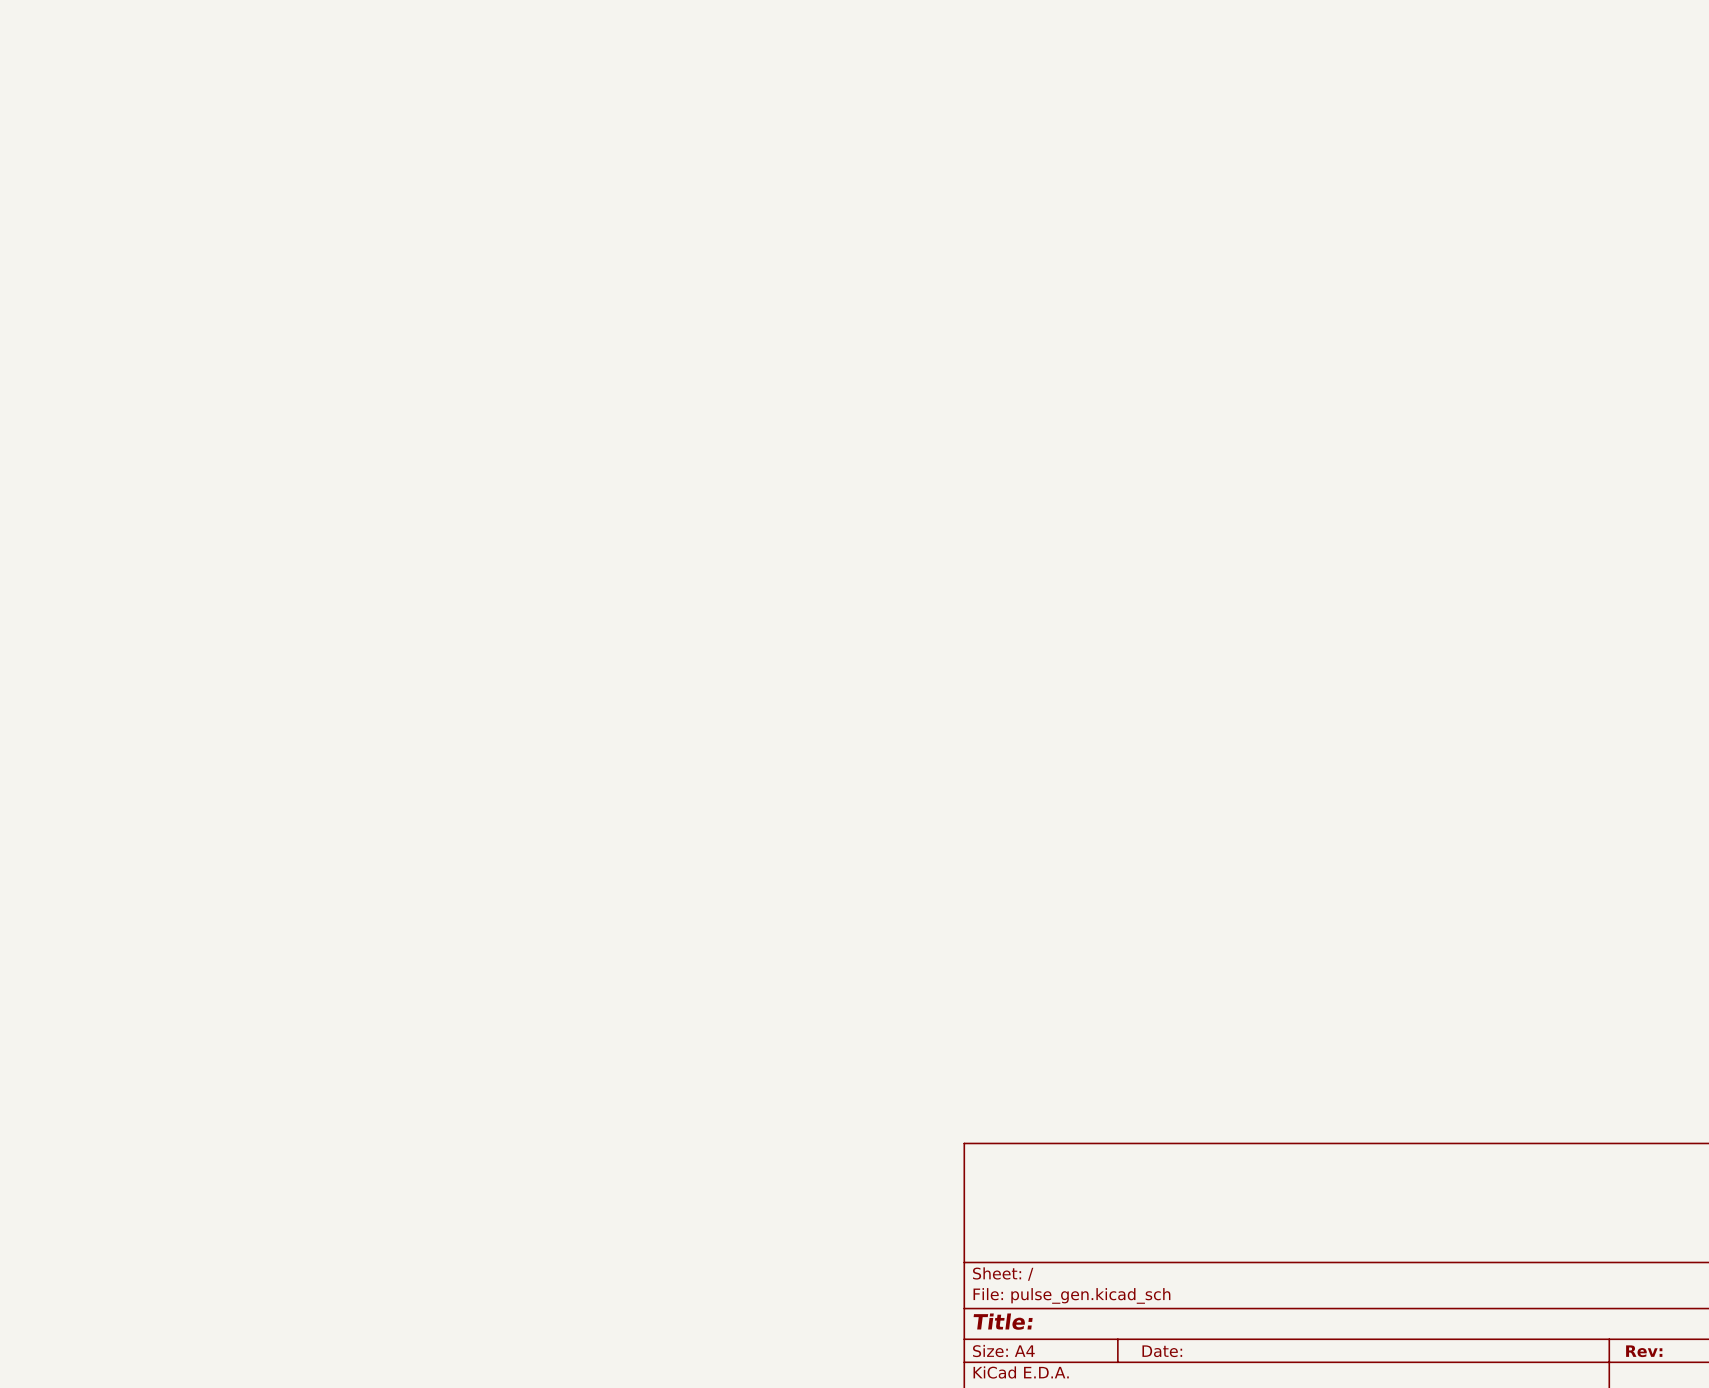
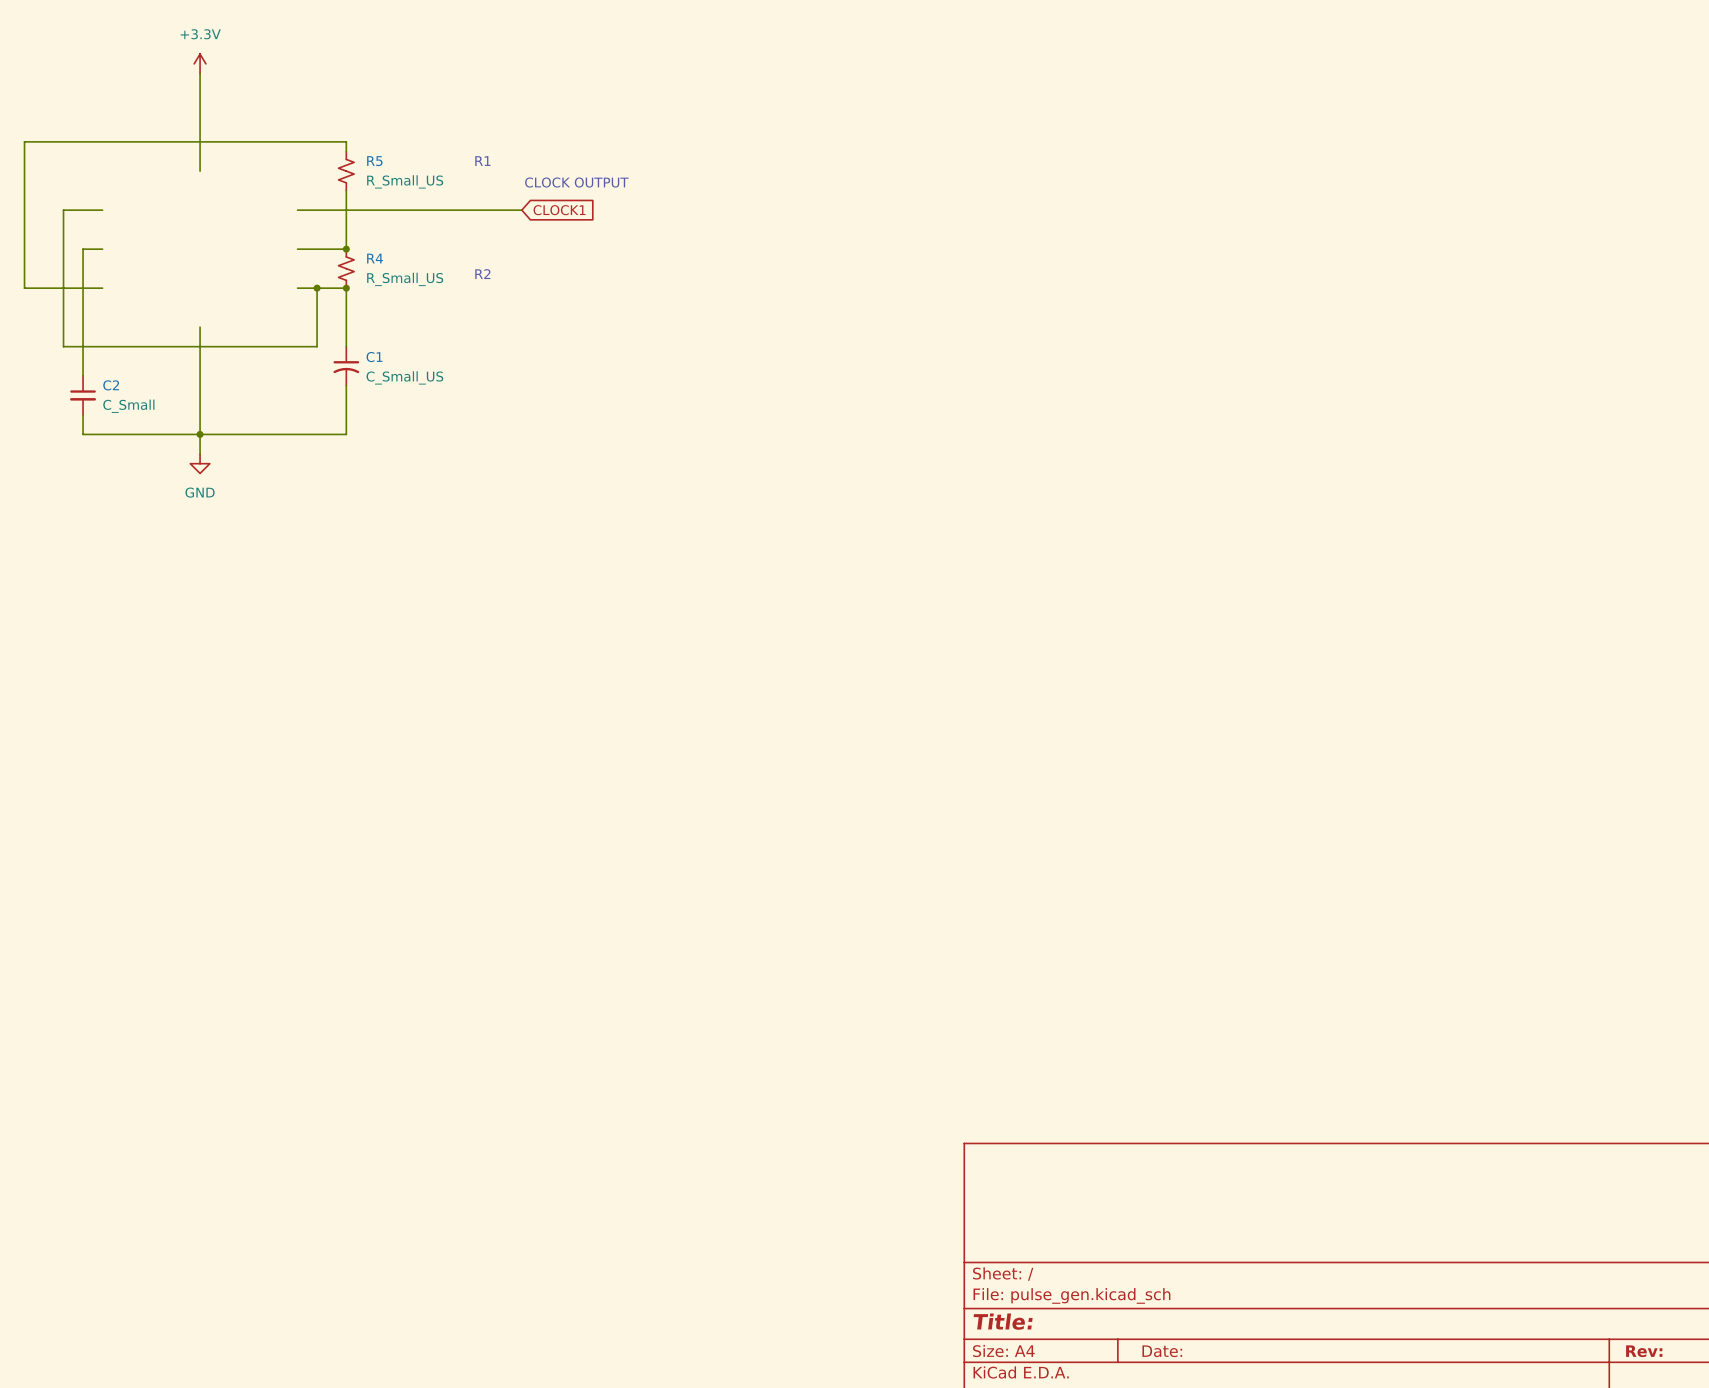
power symbol: none -> +3.3V (200, 63)
wire: none -> (200, 73) (200, 171)
wire: none -> (346, 151) (346, 141) (24, 141) (24, 288) (102, 288)
text: none -> R1 (482, 161)
R5: none -> R_Small_US (346, 171)
text: none -> CLOCK OUTPUT (576, 182)
wire: none -> (346, 190) (346, 249) (297, 249)
wire: none -> (102, 210) (63, 210) (63, 346) (317, 346) (317, 288)
wire: none -> (297, 210) (521, 210)
global label: none -> CLOCK1 (559, 210)
wire: none -> (102, 249) (83, 249) (83, 375)
junction: none -> (346, 249)
R4: none -> R_Small_US (346, 268)
text: none -> R2 (482, 274)
wire: none -> (297, 288) (346, 288) (346, 346)
junction: none -> (317, 288)
junction: none -> (346, 288)
wire: none -> (200, 327) (200, 453)
C1: none -> C_Small_US (346, 366)
wire: none -> (346, 385) (346, 434) (83, 434) (83, 414)
C2: none -> C_Small (83, 395)
junction: none -> (200, 434)
power symbol: none -> GND (200, 463)

